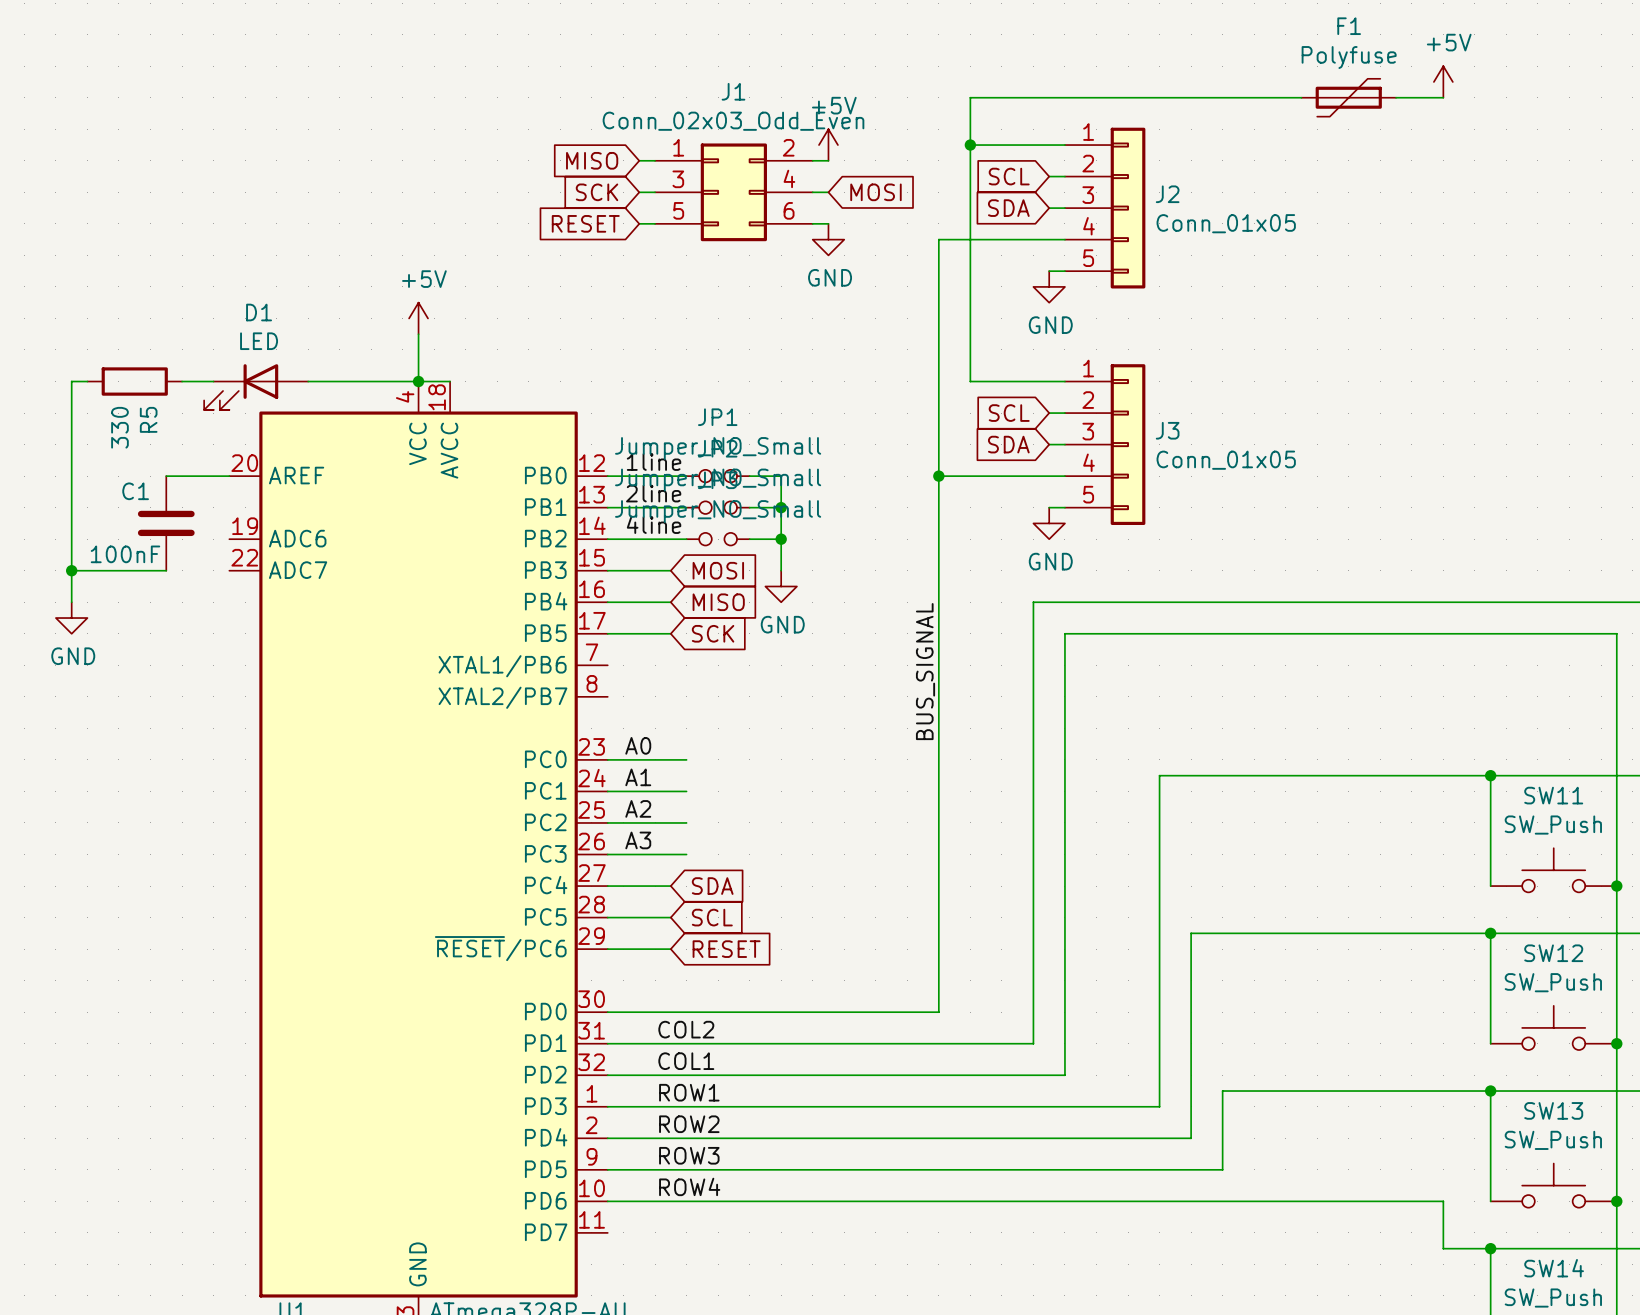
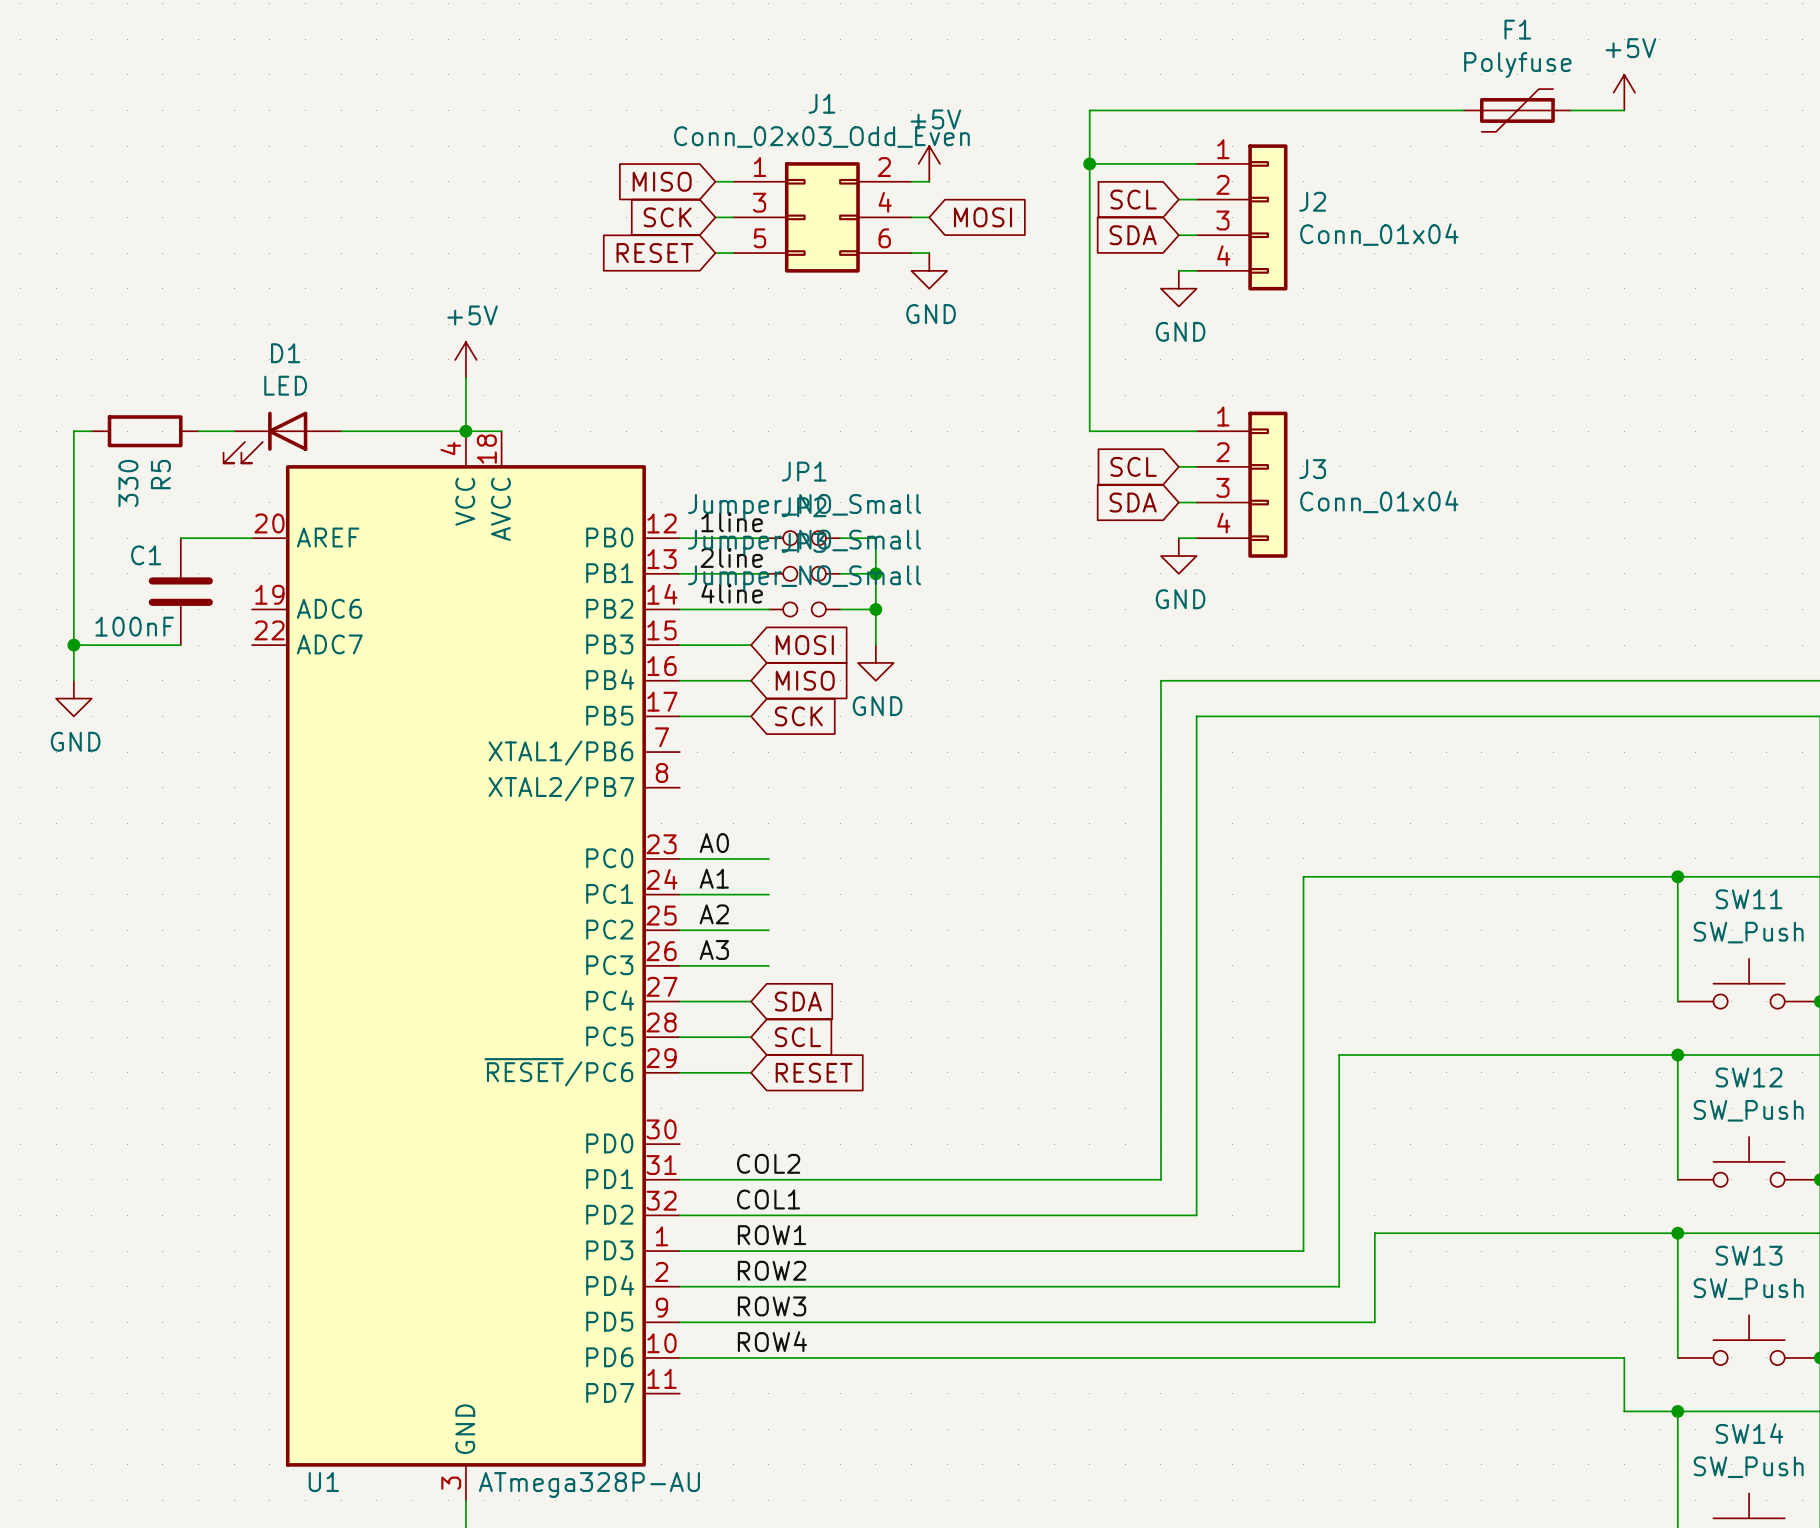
J2 symbol: [1064, 127, 1146, 289] -> [1196, 144, 1288, 291]
J2 value: Conn_01x05 (1226, 223) -> Conn_01x04 (1379, 234)
wire: (1049, 239) (938, 239) (938, 1012) (607, 1012) -> none
wire: (1049, 271) (1064, 271) -> none
power symbol position: GND (1049, 286) -> GND (1178, 288)
J3 symbol: [1064, 364, 1146, 526] -> [1196, 411, 1288, 558]
J3 value: Conn_01x05 (1226, 460) -> Conn_01x04 (1379, 501)
wire: (938, 476) (1049, 476) -> none
junction: (938, 476) -> none
wire: (1049, 507) (1064, 507) -> none
power symbol position: GND (1049, 523) -> GND (1178, 556)
label: BUS_SIGNAL (925, 671) -> none

